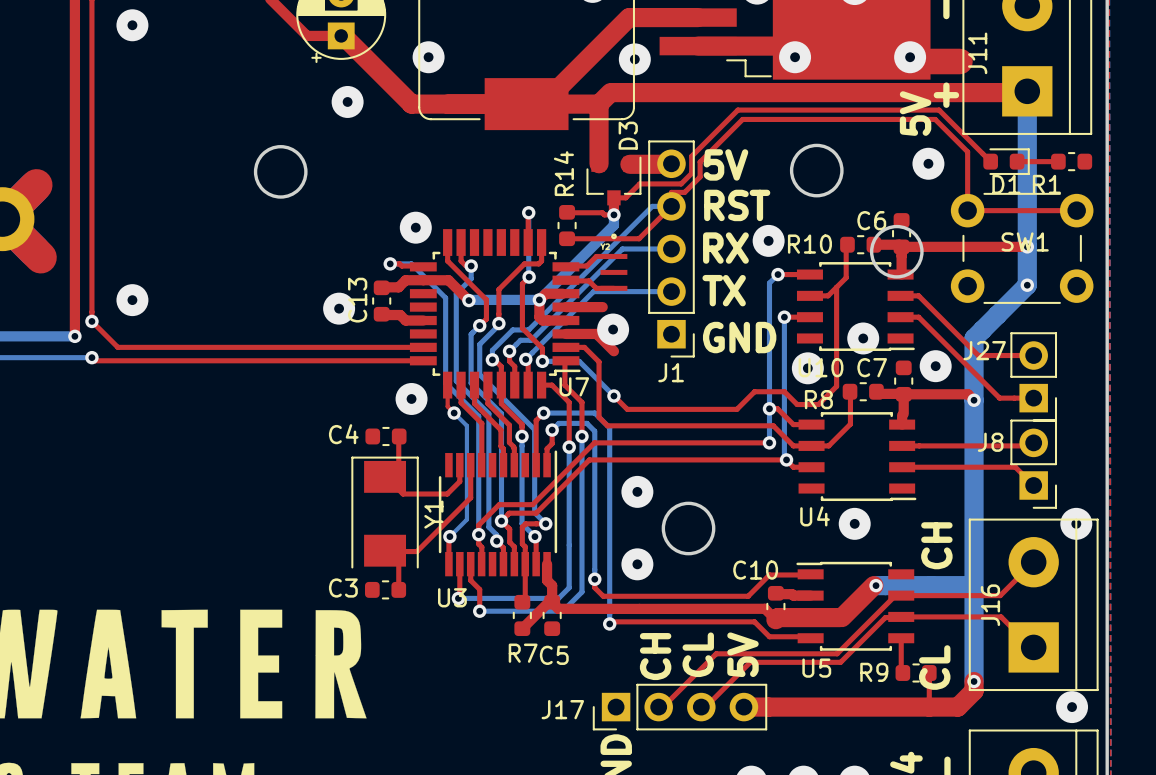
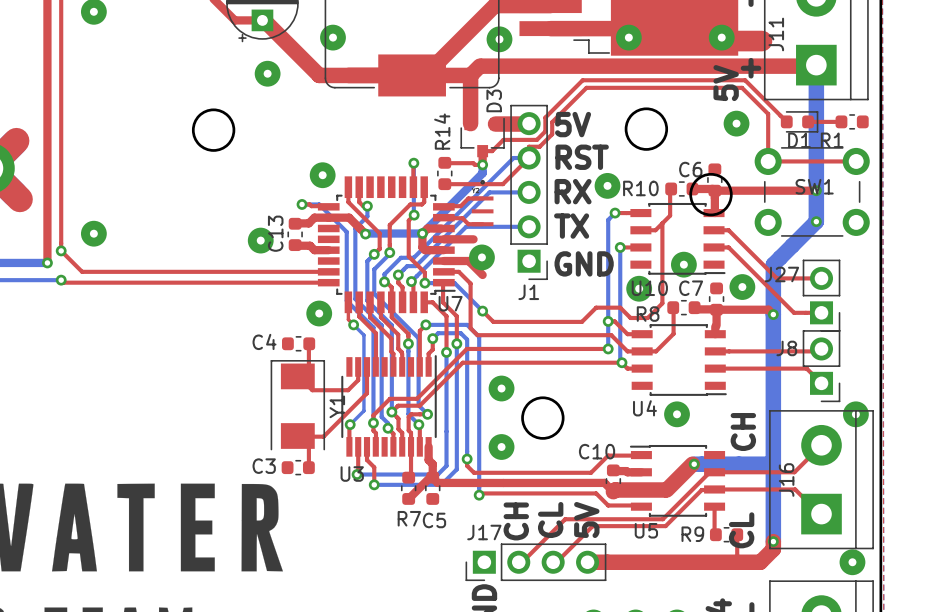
J17 name position: J17 (562, 709) -> J17 (484, 532)

